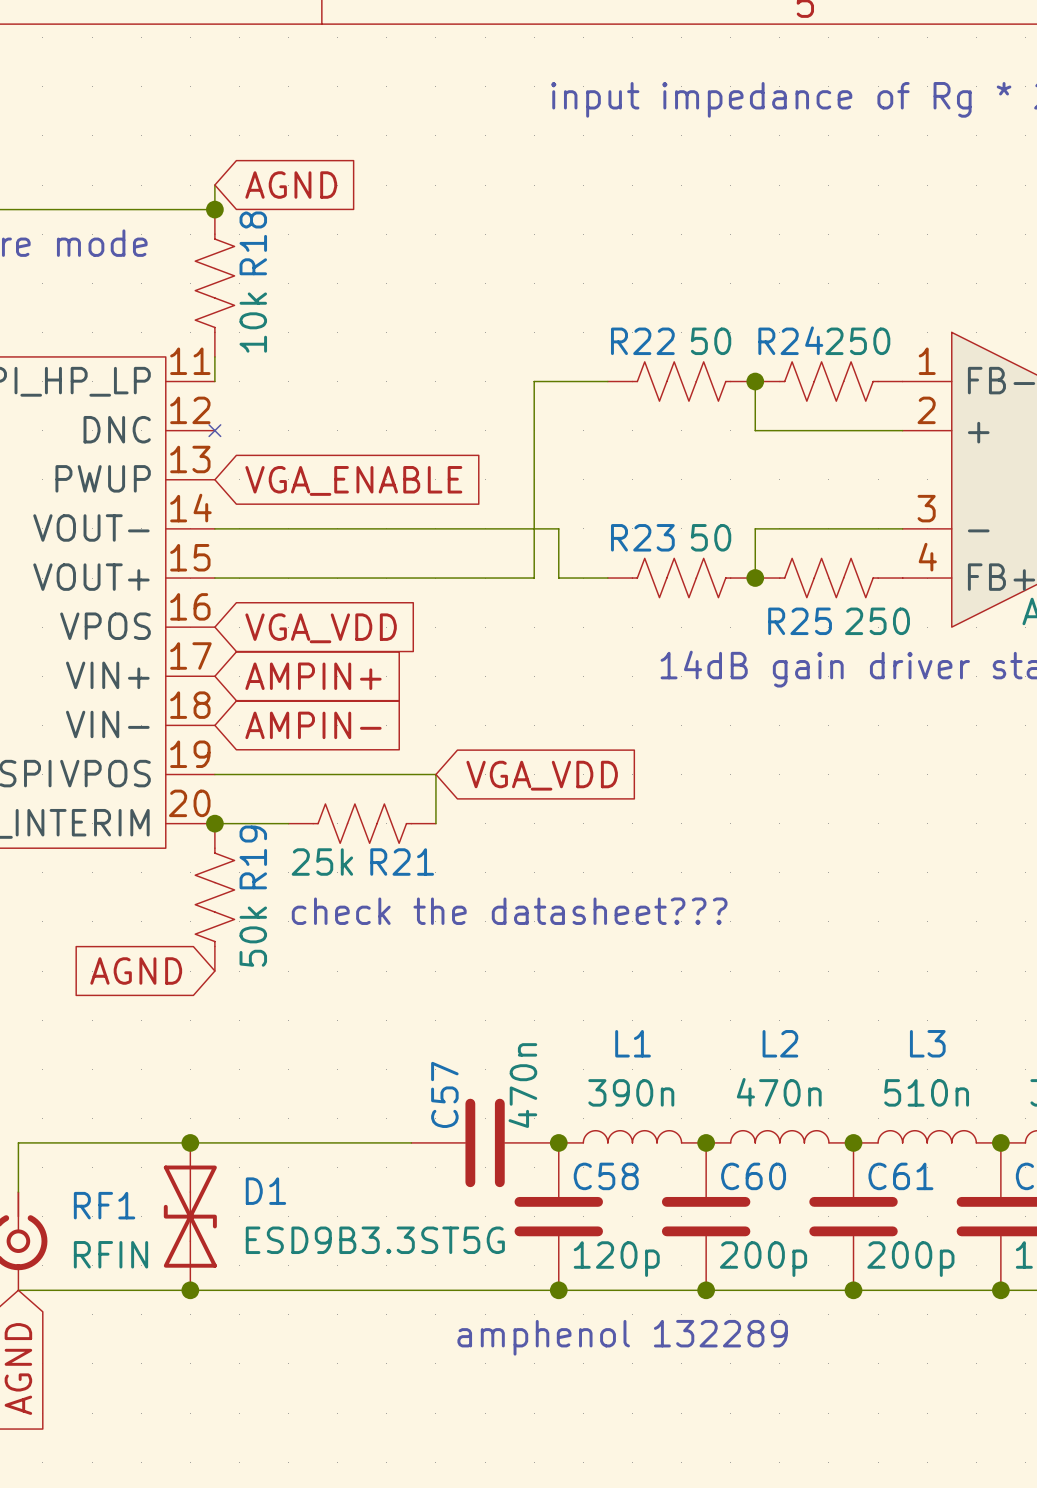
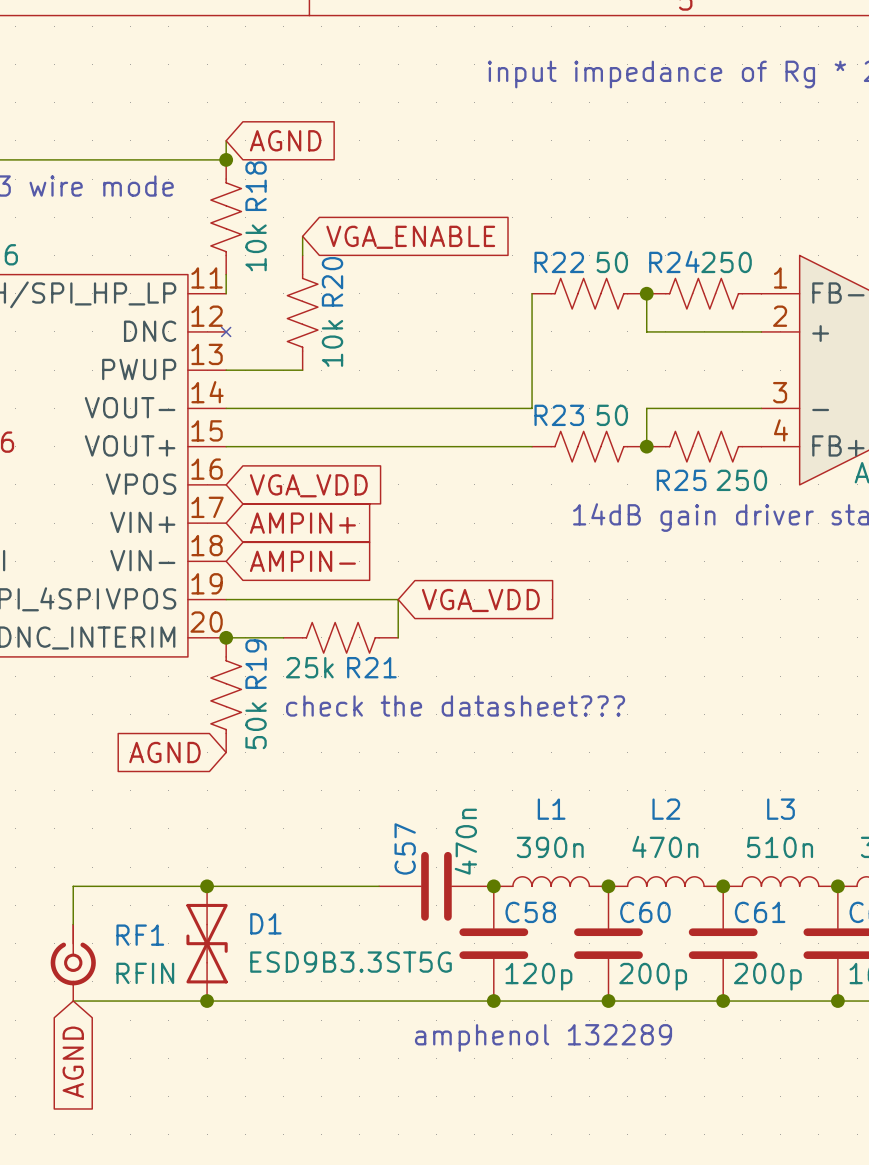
wire: none -> (302, 236) (302, 255)
wire: (607, 381) (534, 381) (534, 578) -> (532, 293) (532, 408) (493, 408)
R20: none -> 10k (302, 312)
wire: none -> (226, 370) (302, 370)
global label position: VGA_ENABLE (353, 480) -> VGA_ENABLE (410, 237)
wire: (558, 528) (558, 578) -> (474, 446) (493, 446)

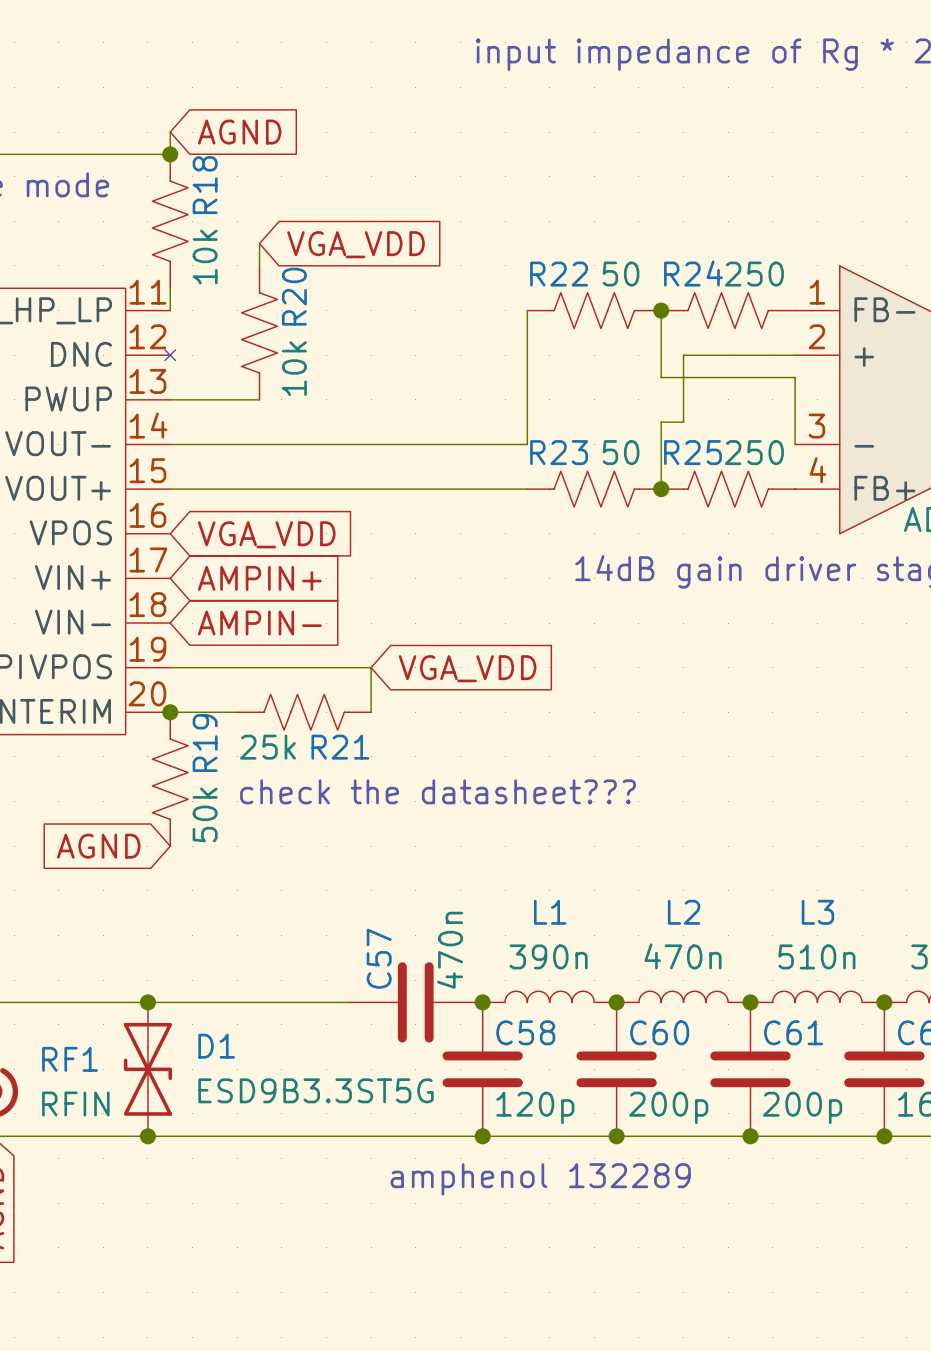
global label: VGA_ENABLE (410, 237) -> VGA_VDD (356, 244)
wire: (646, 331) (665, 331) -> (661, 444) (661, 422) (683, 422) (683, 355)
wire: (646, 408) (761, 408) -> (661, 355) (661, 377) (795, 377) (795, 444)
R25 name position: R25 (681, 480) -> R25 (692, 452)
R25 value position: 250 (741, 480) -> 250 (754, 452)

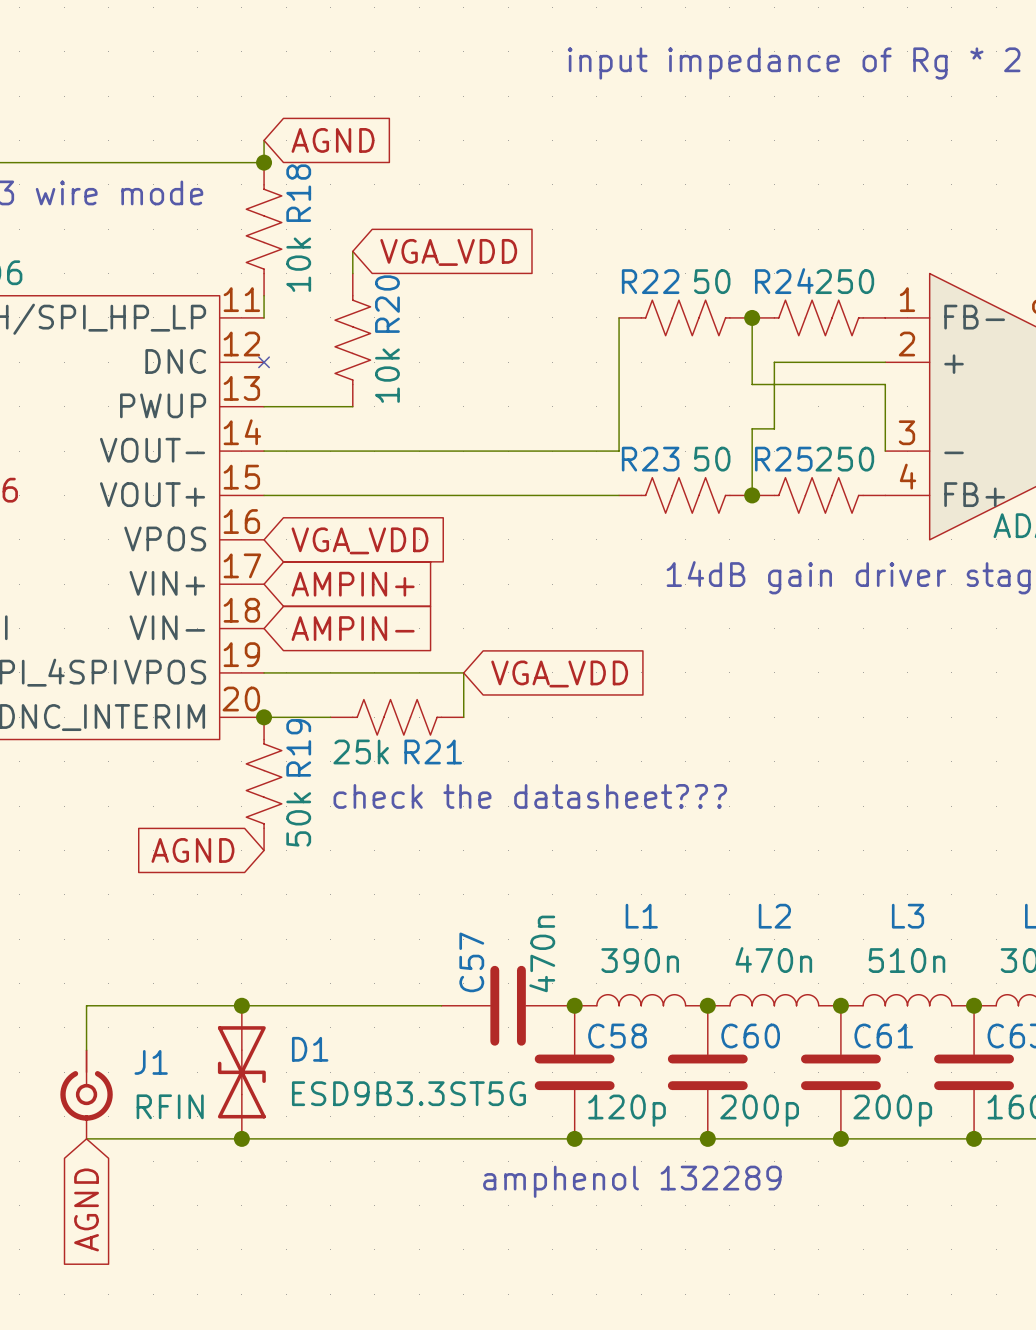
RF1 name: RF1 (70, 1059) -> J1 (151, 1062)

